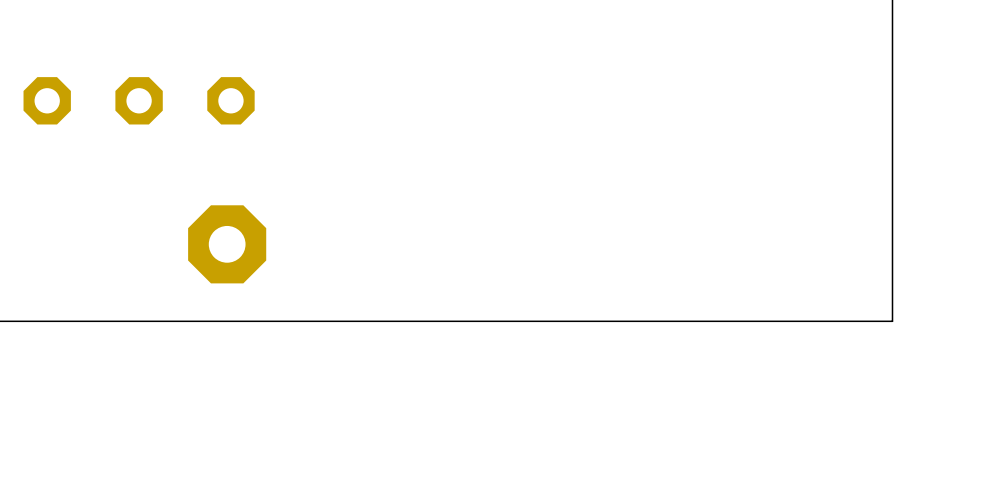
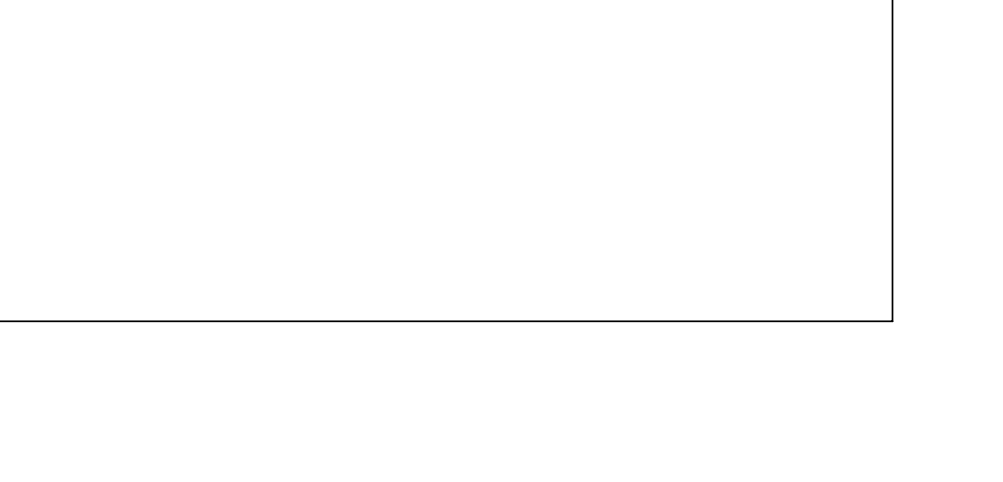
part: (139, 100) -> none
part: (227, 244) -> none

